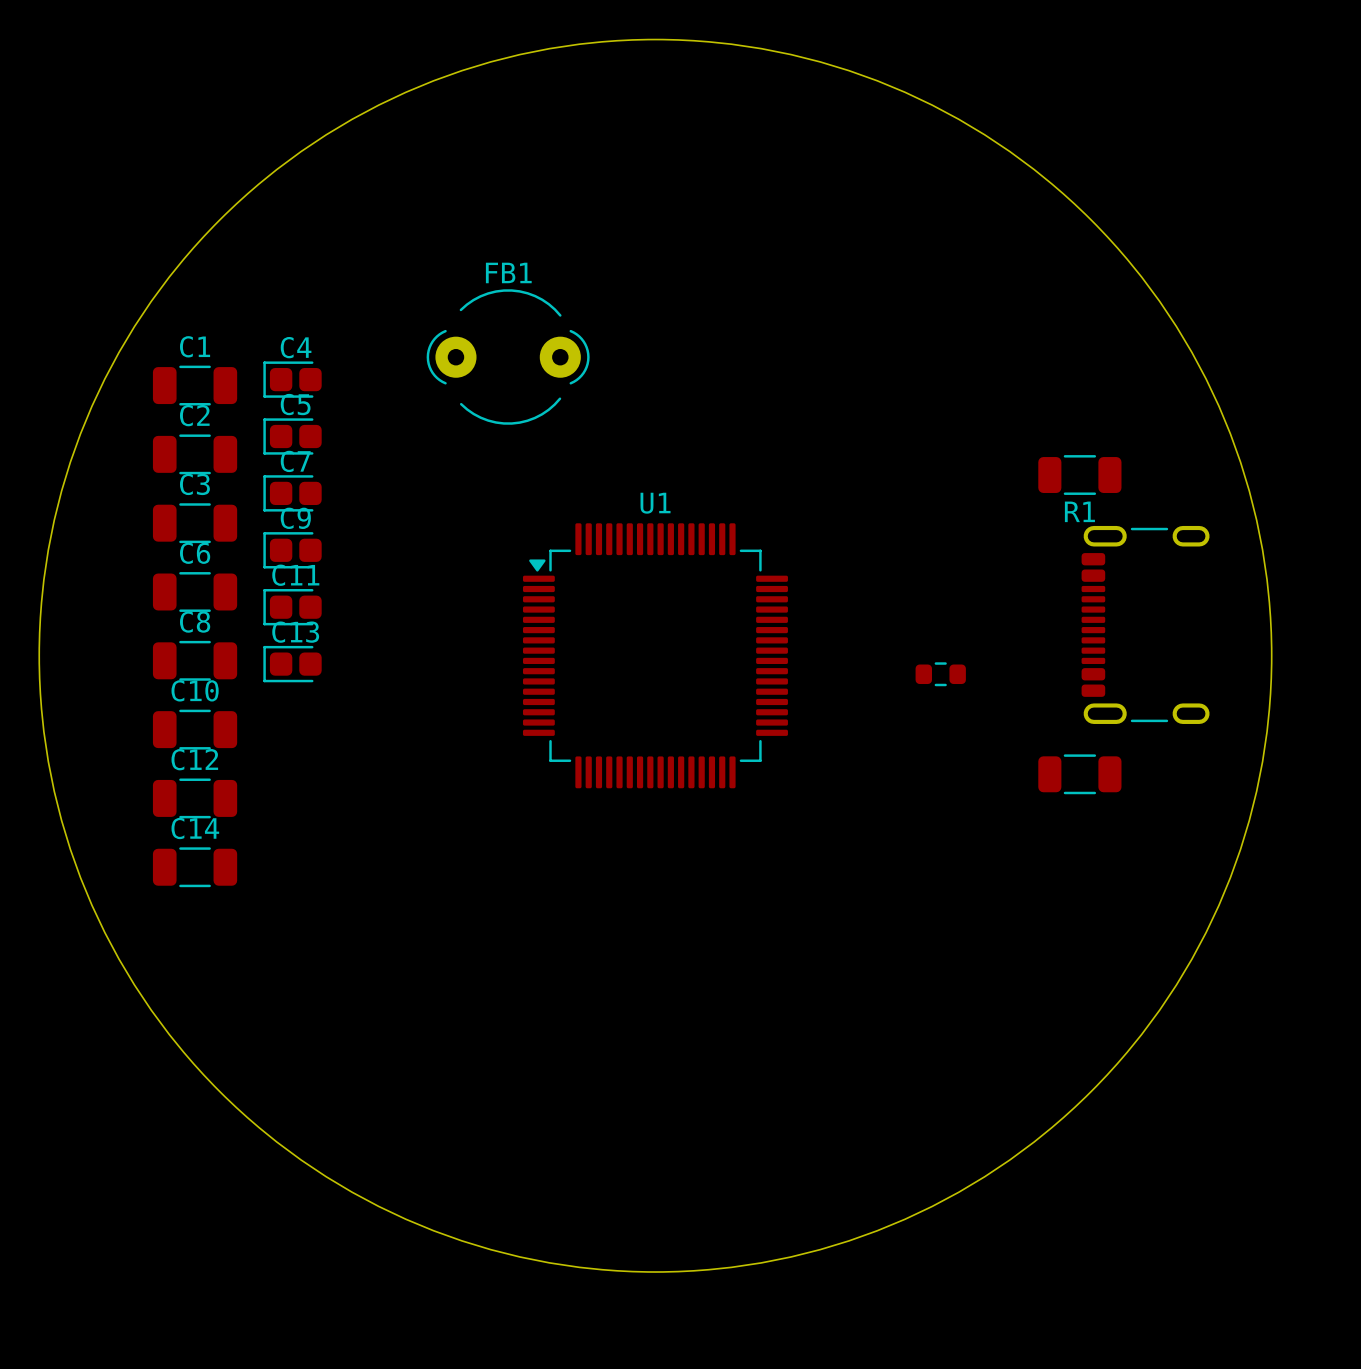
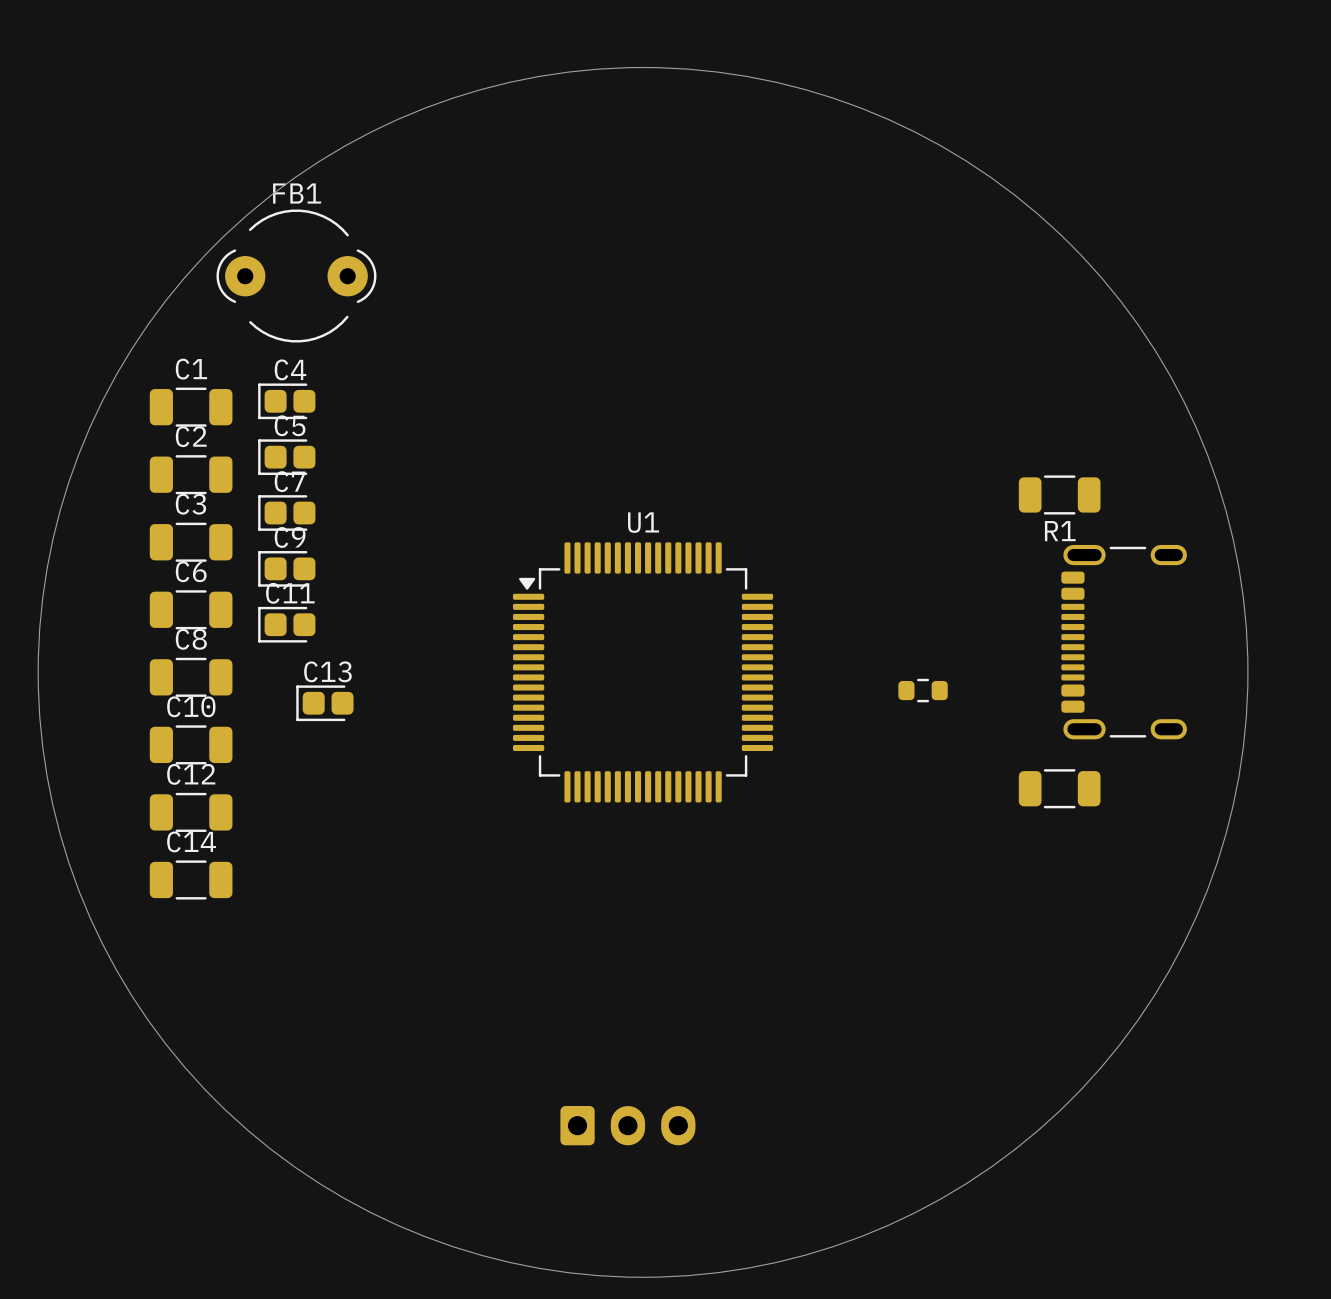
FB1 position: (508, 357) -> (296, 276)
C13 position: (292, 664) -> (324, 703)
part: none -> (627, 1125)

